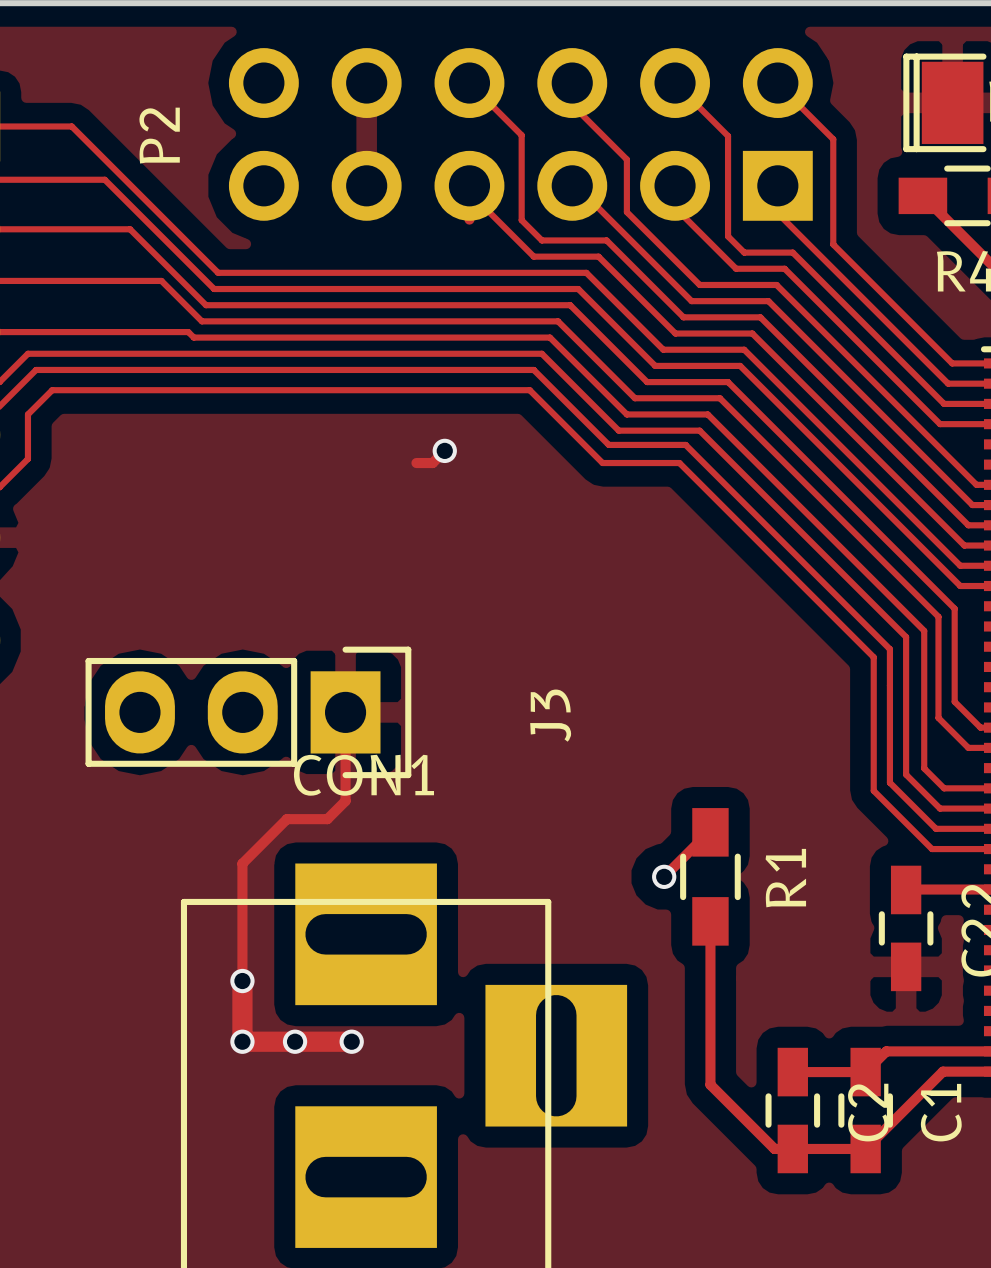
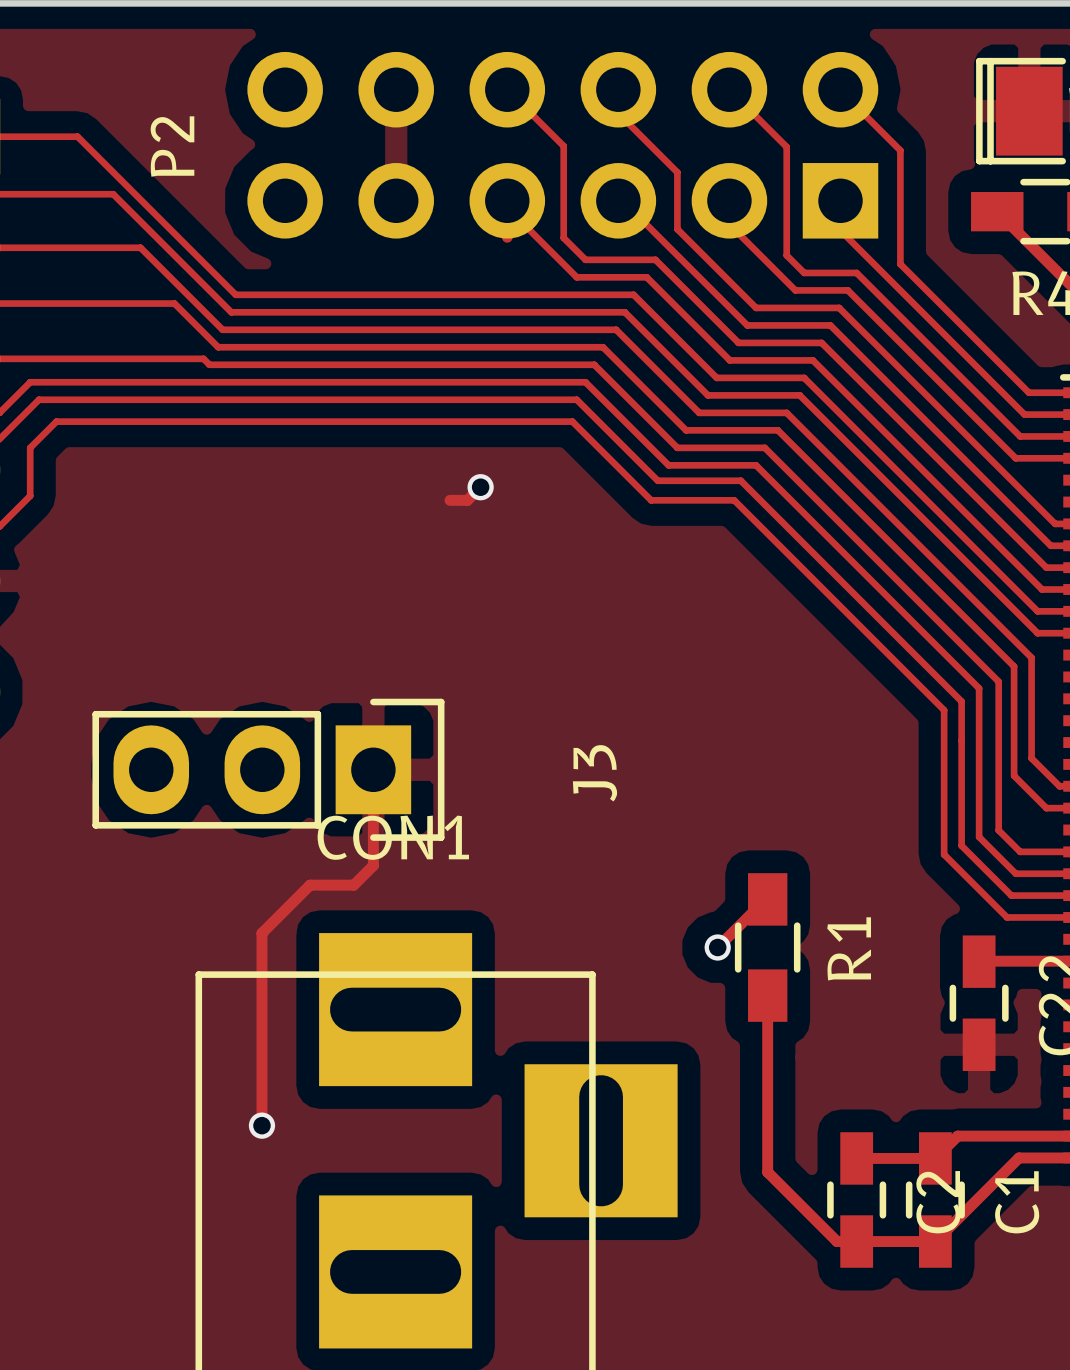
track: (242, 981) (242, 1041) (351, 1041) -> none
via: (242, 981) -> none
via: (295, 1041) -> none
via: (351, 1041) -> none

